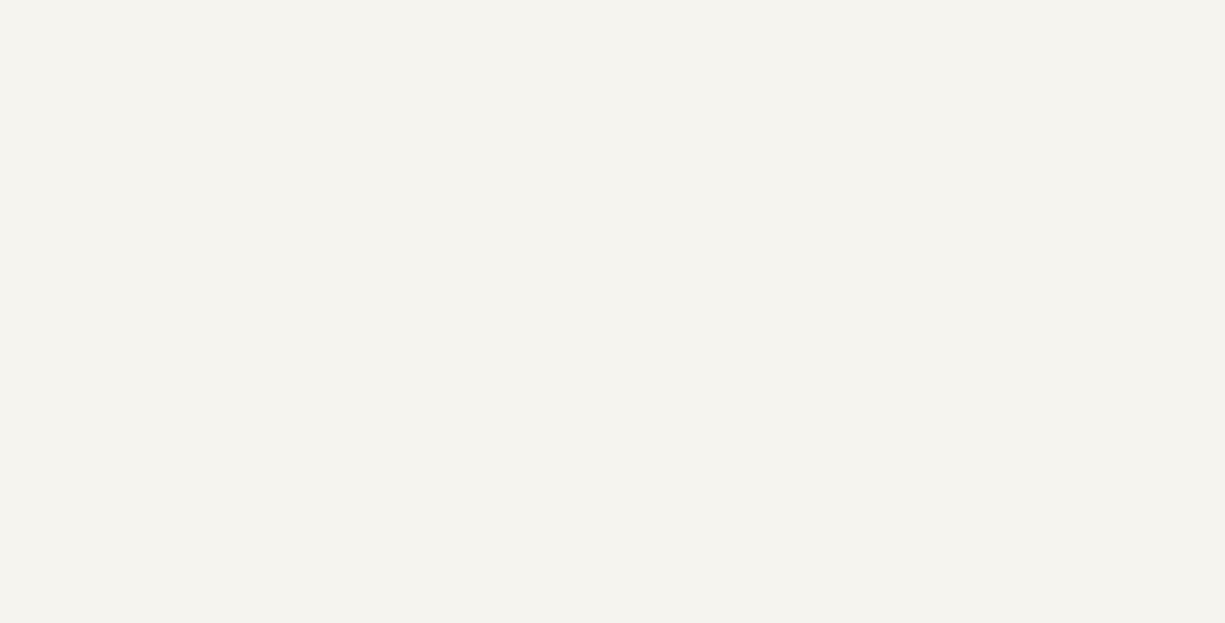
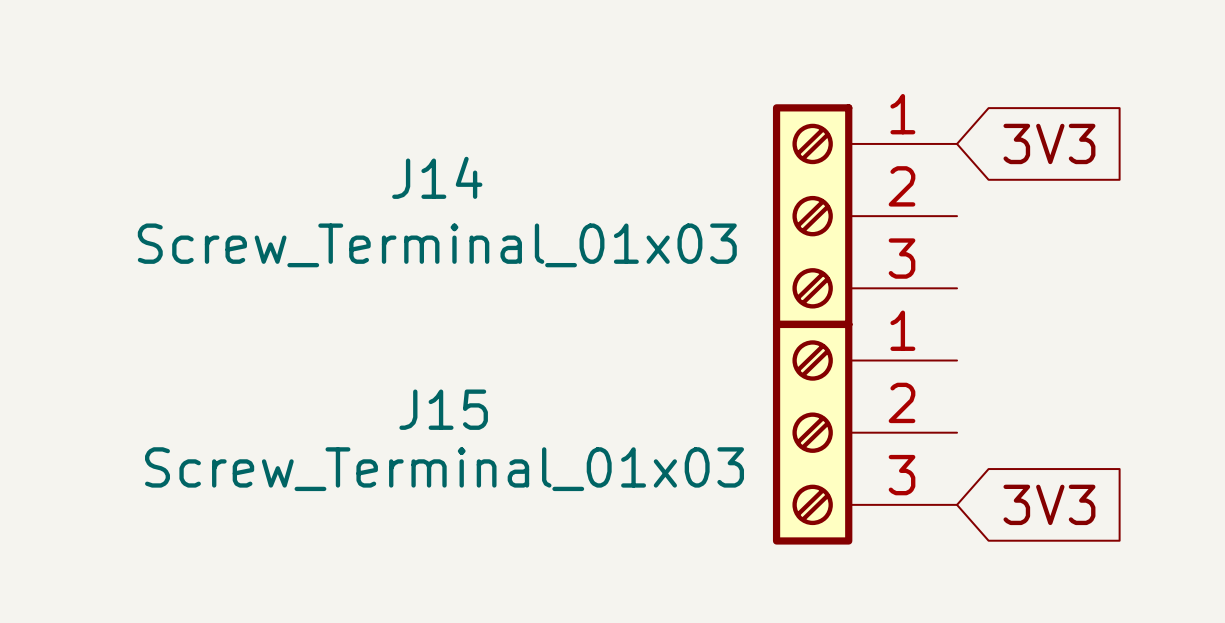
global label: none -> 3V3 (1049, 143)
J14: none -> Screw_Terminal_01x03 (864, 216)
J15: none -> Screw_Terminal_01x03 (864, 432)
global label: none -> 3V3 (1049, 504)

